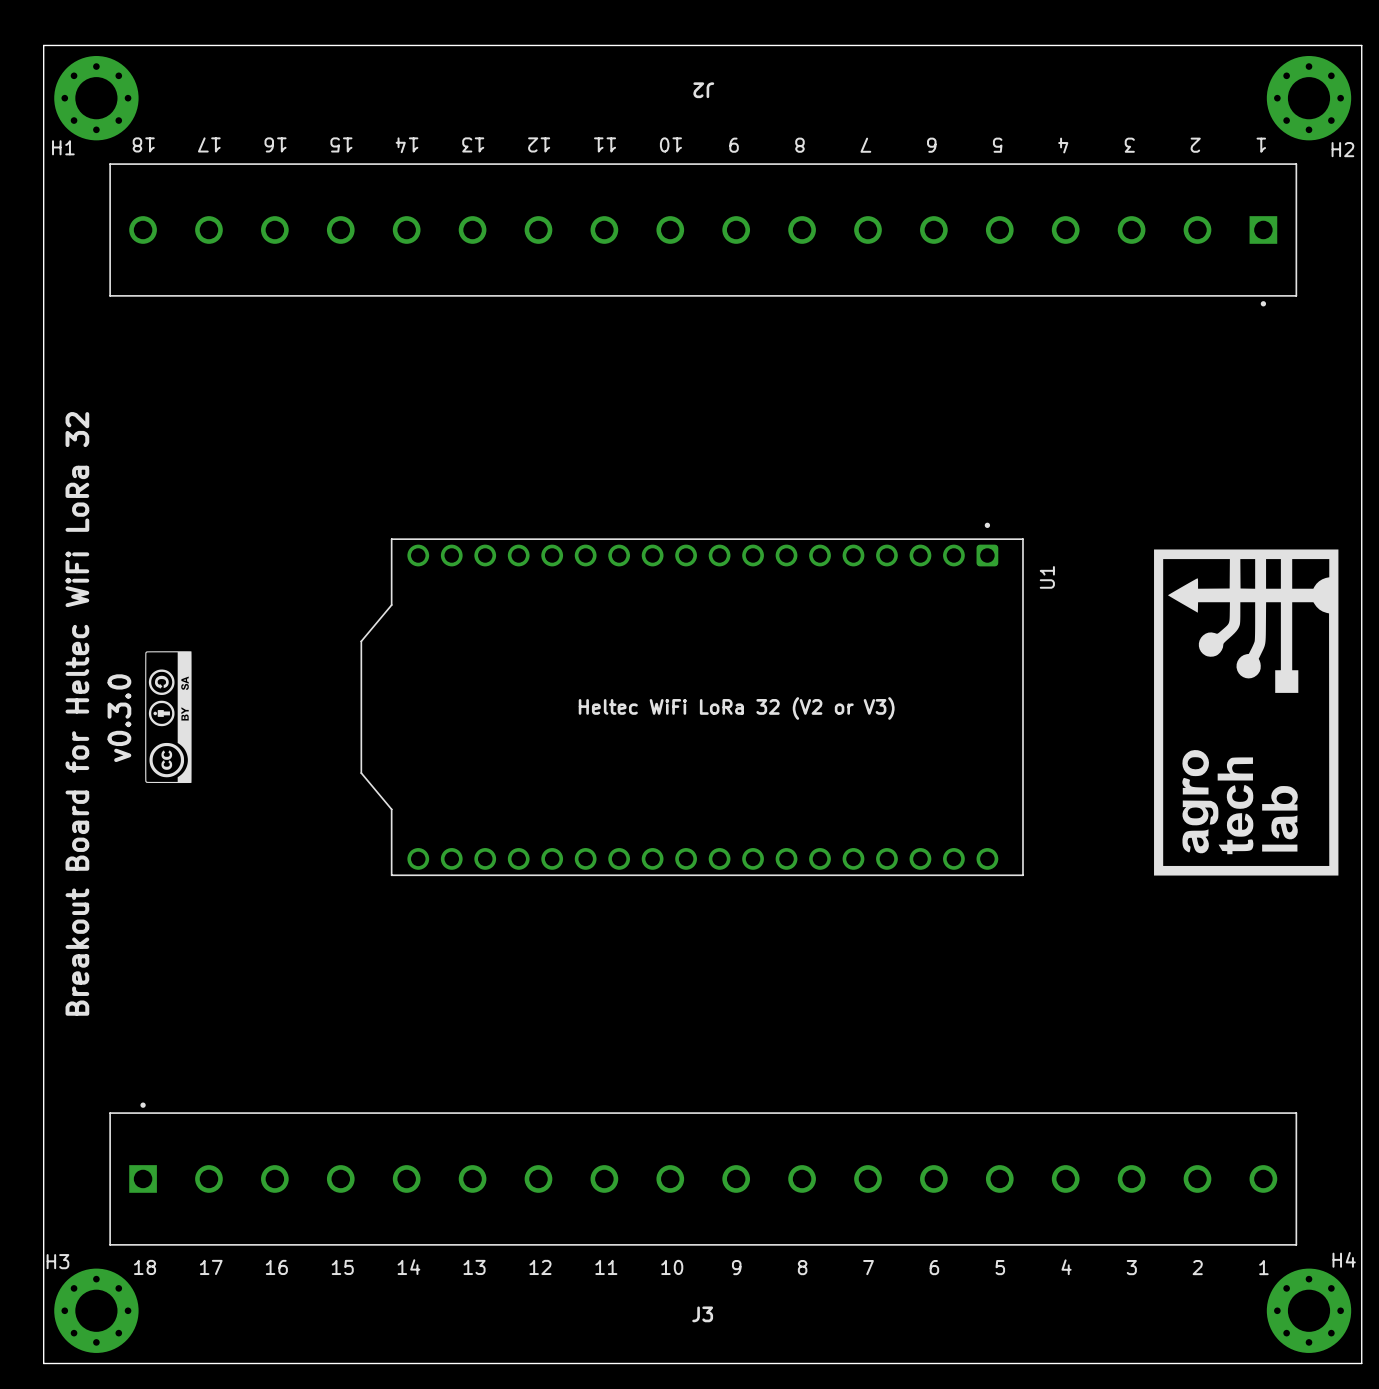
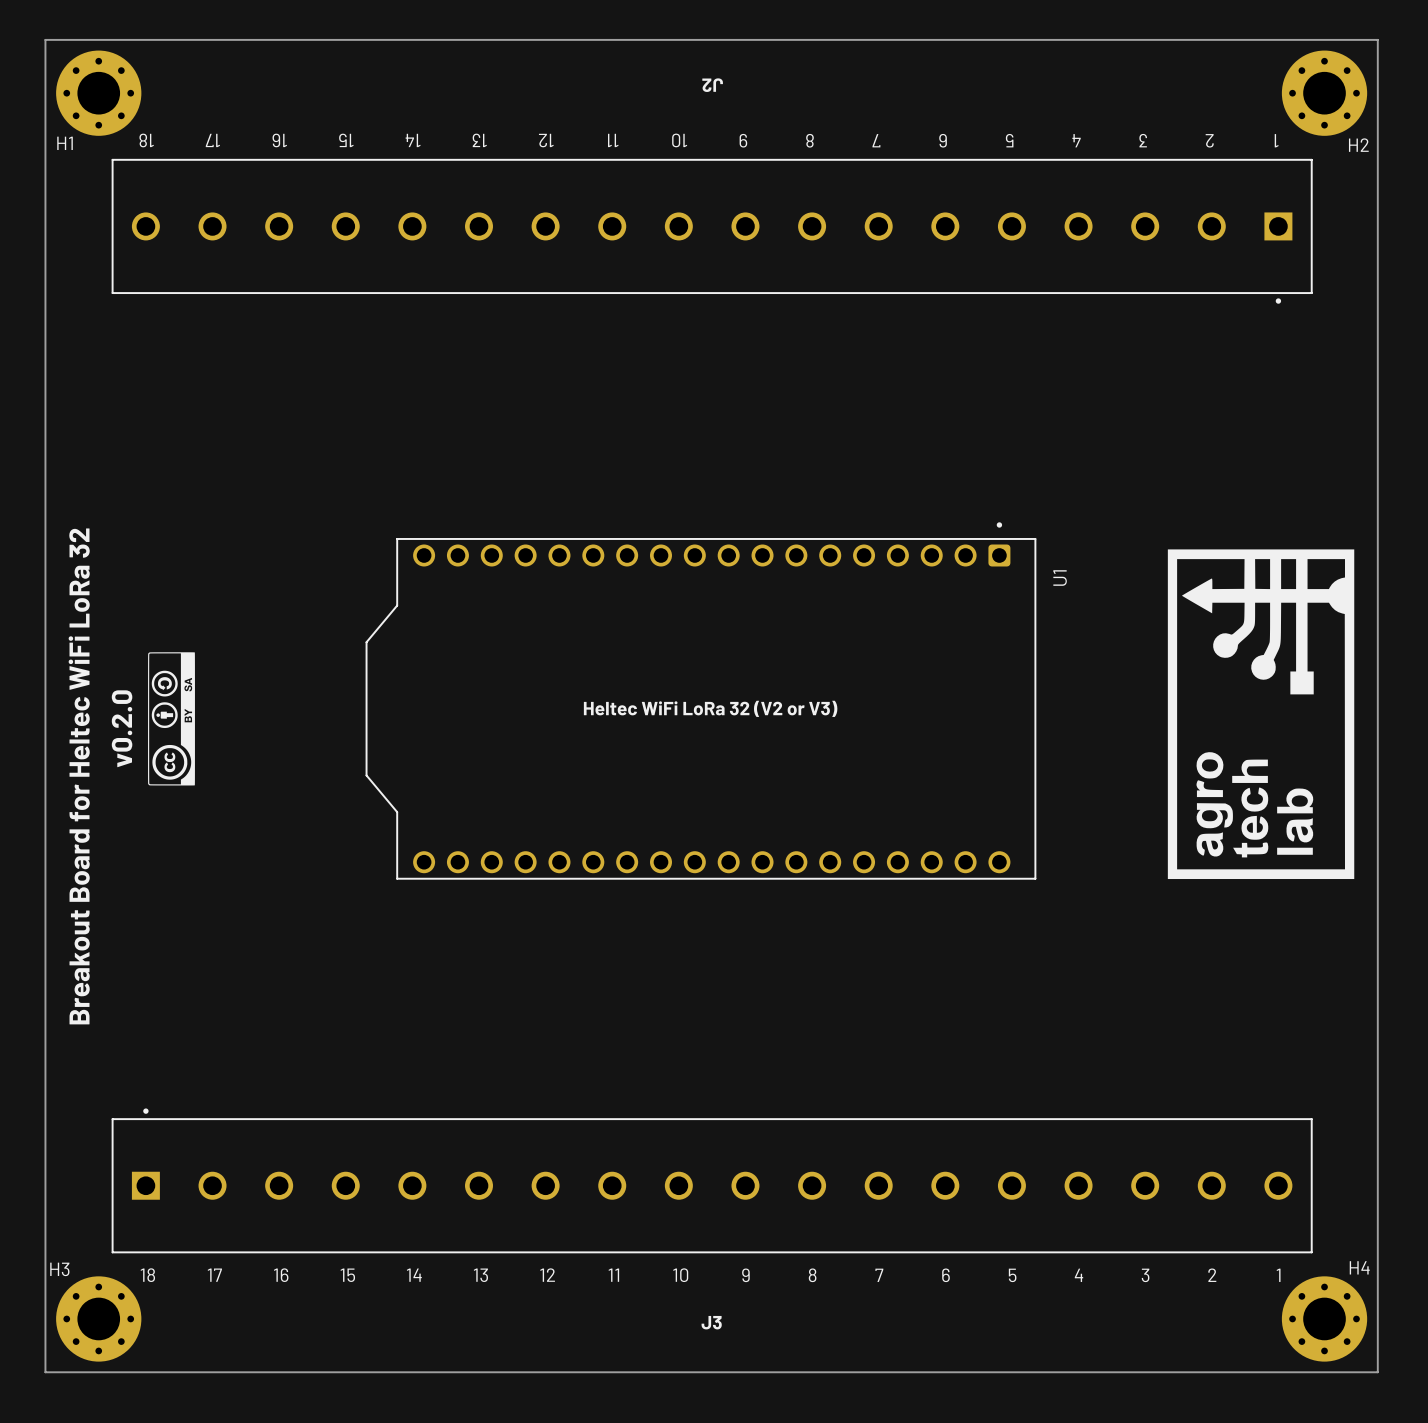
text: v0.3.0 (119, 718) -> v0.2.0 (122, 728)

